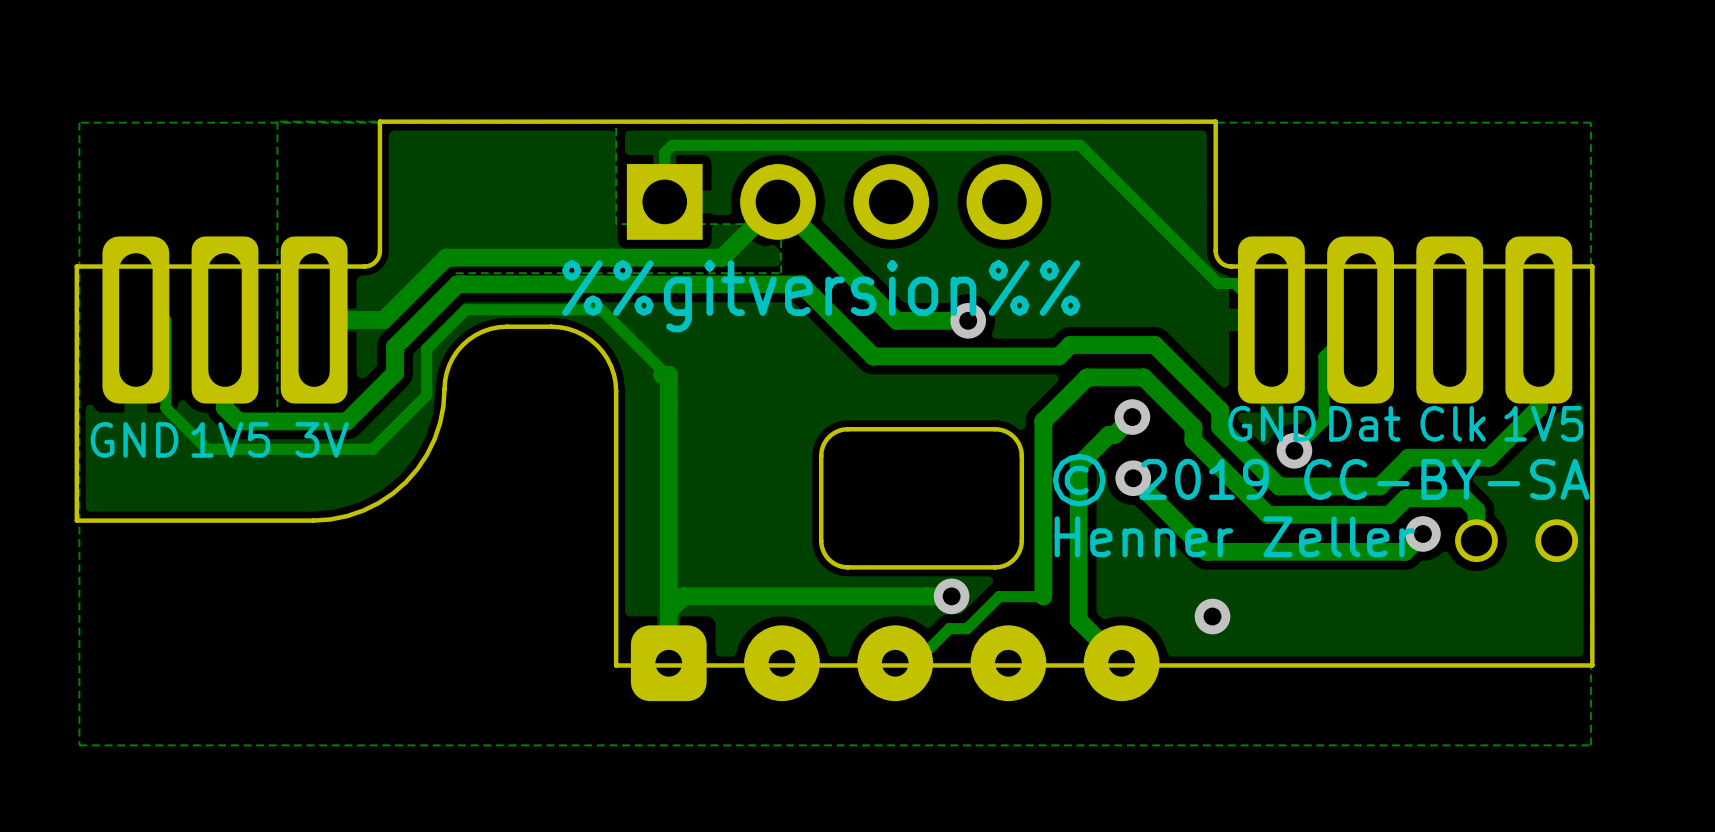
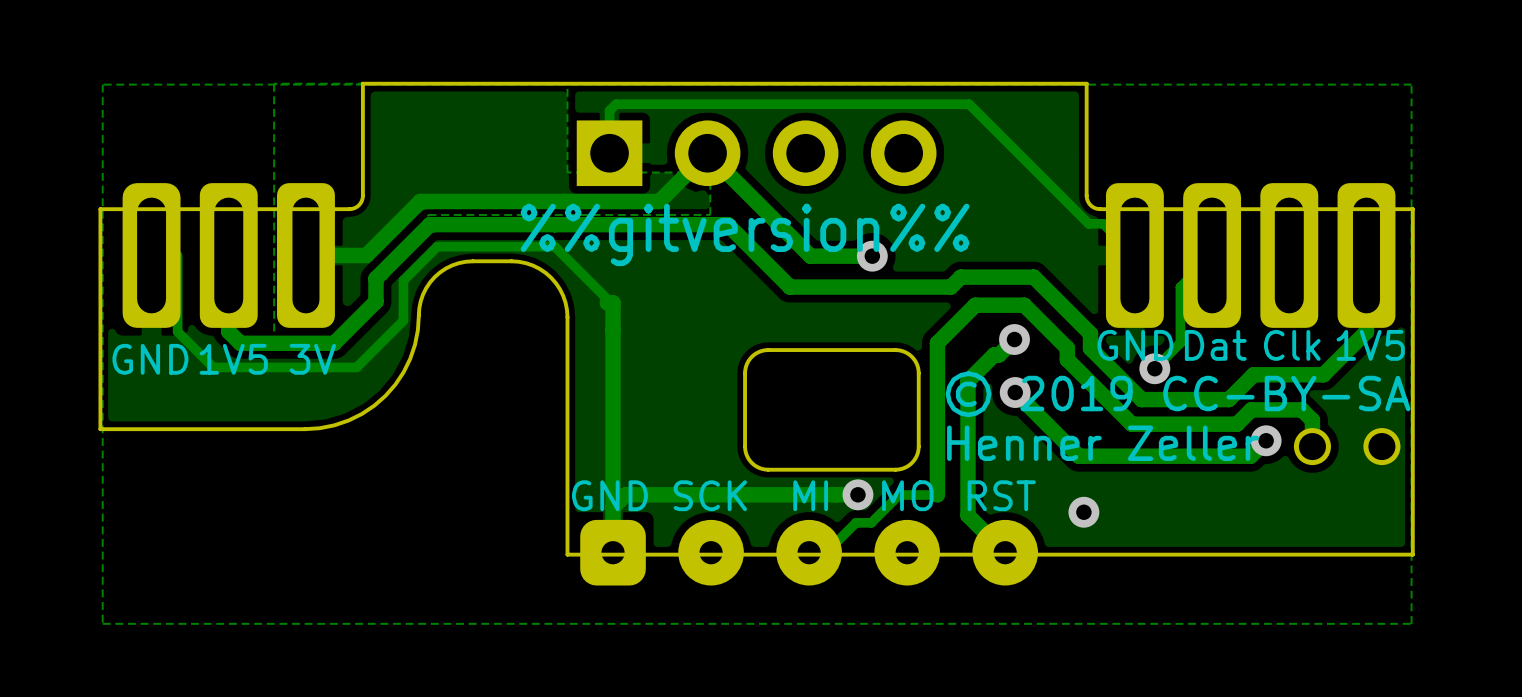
text: none -> GND (609, 495)
text: none -> SCK (710, 495)
text: none -> MI (810, 495)
text: none -> MO (907, 495)
text: none -> RST (1001, 495)

